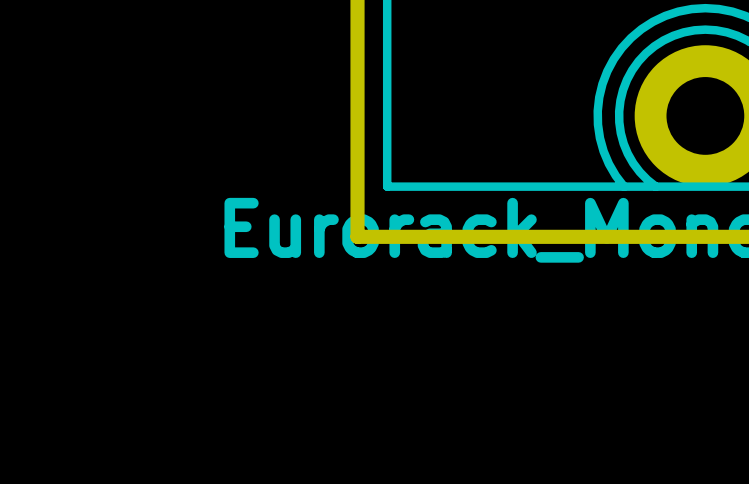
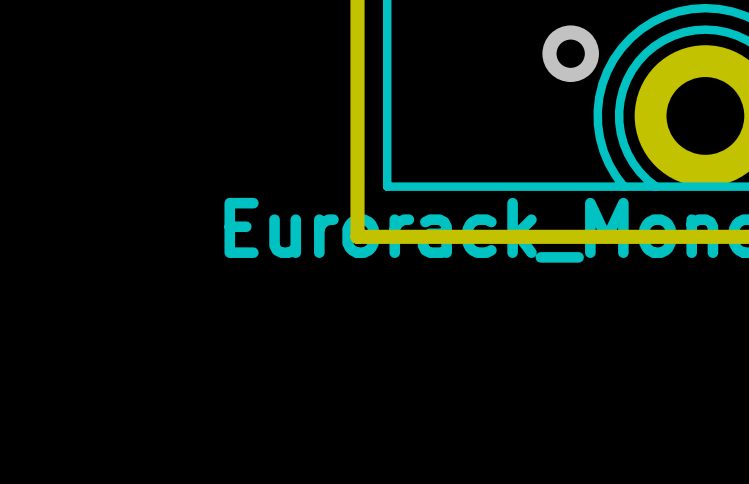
via: none -> (570, 53)

